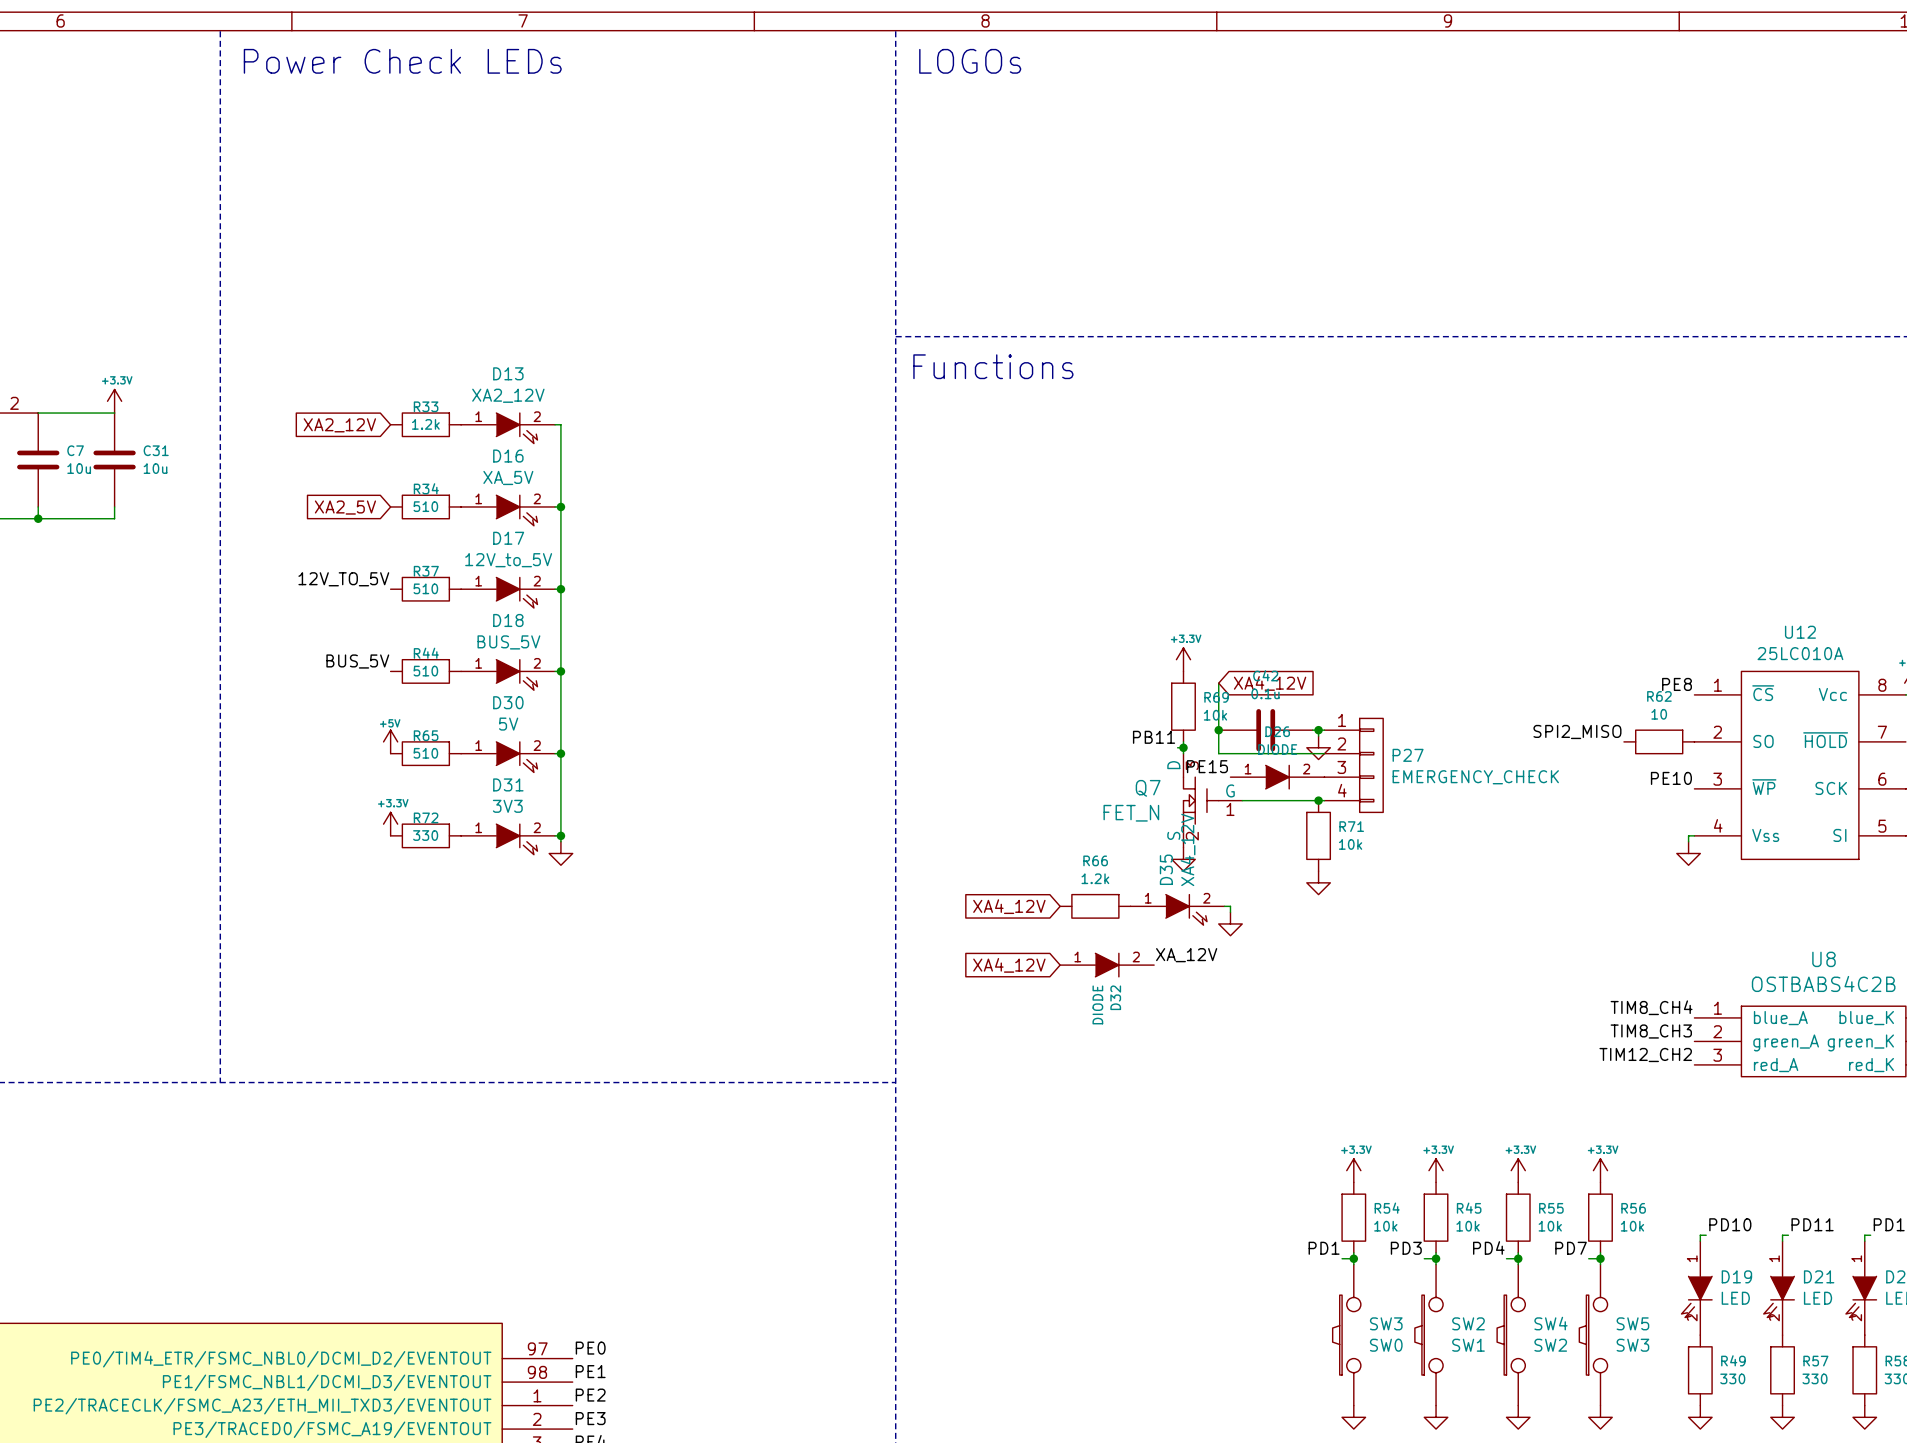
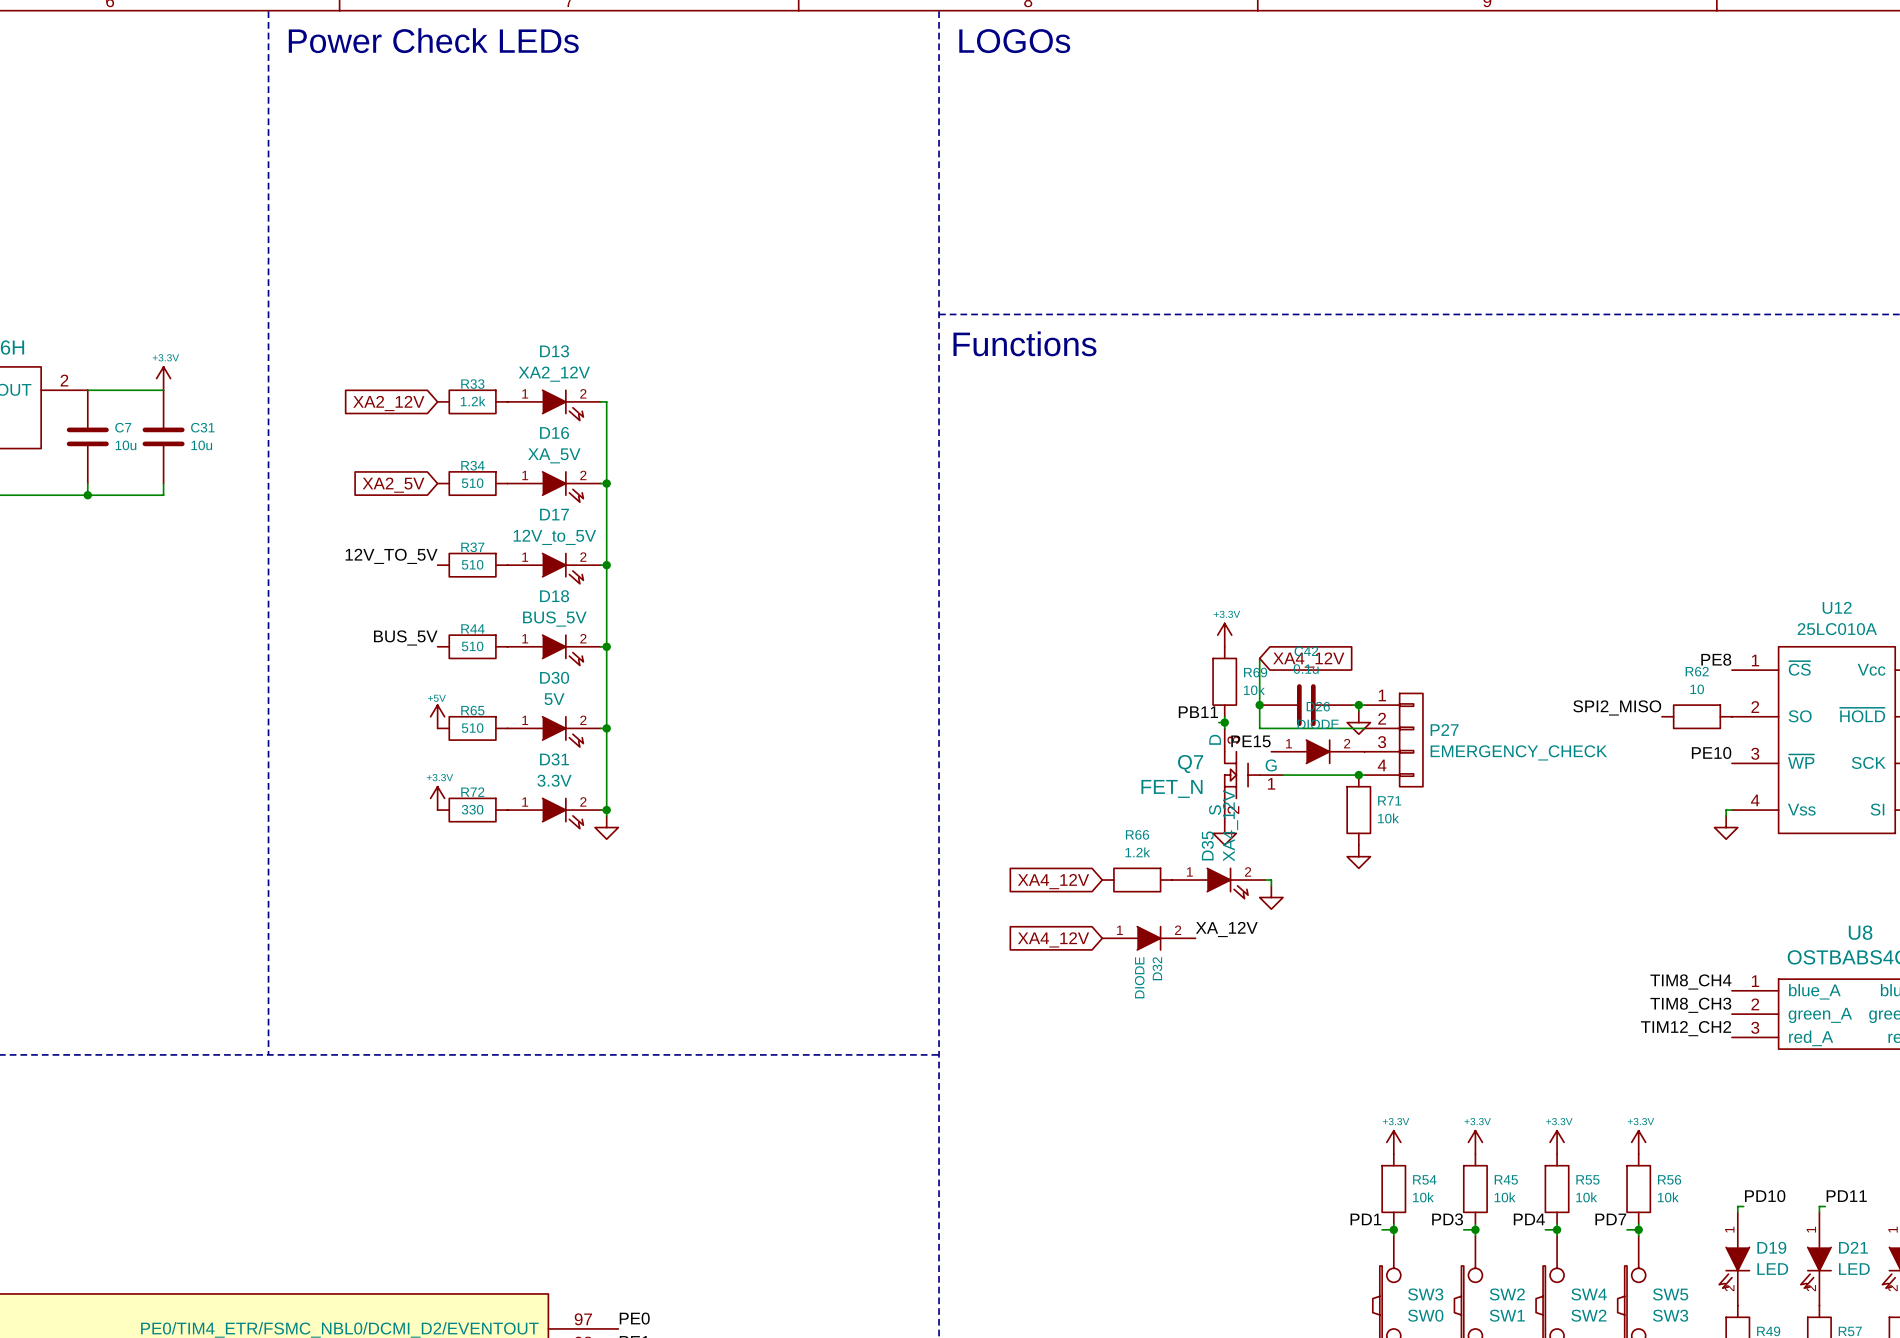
D31 value: 3V3 (507, 806) -> 3.3V (554, 780)

